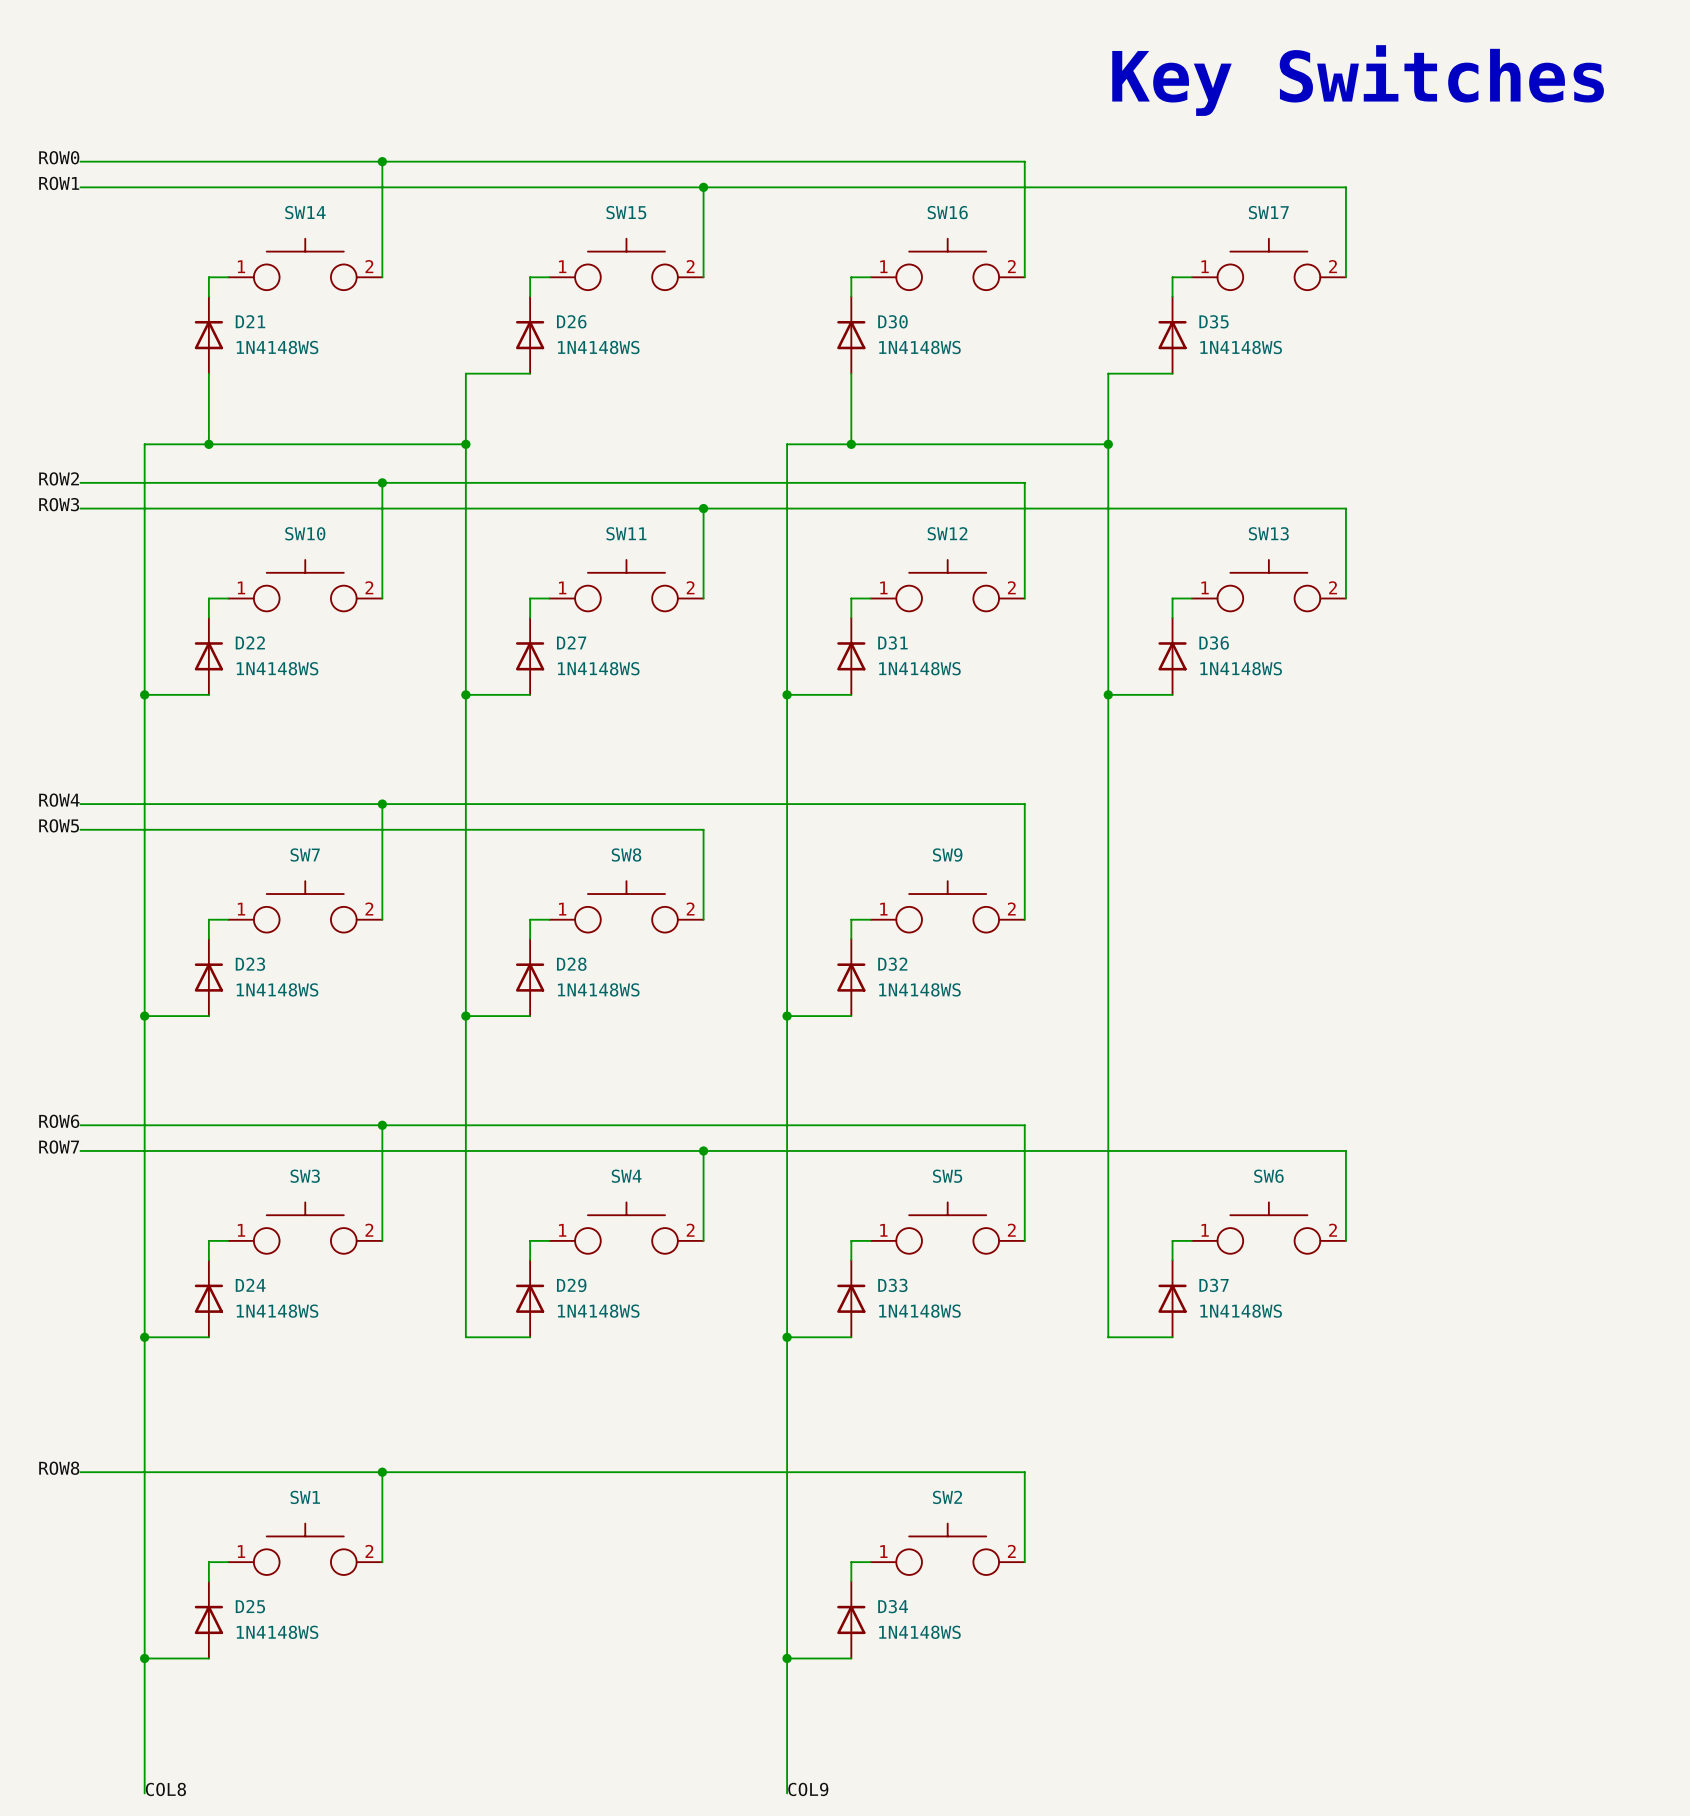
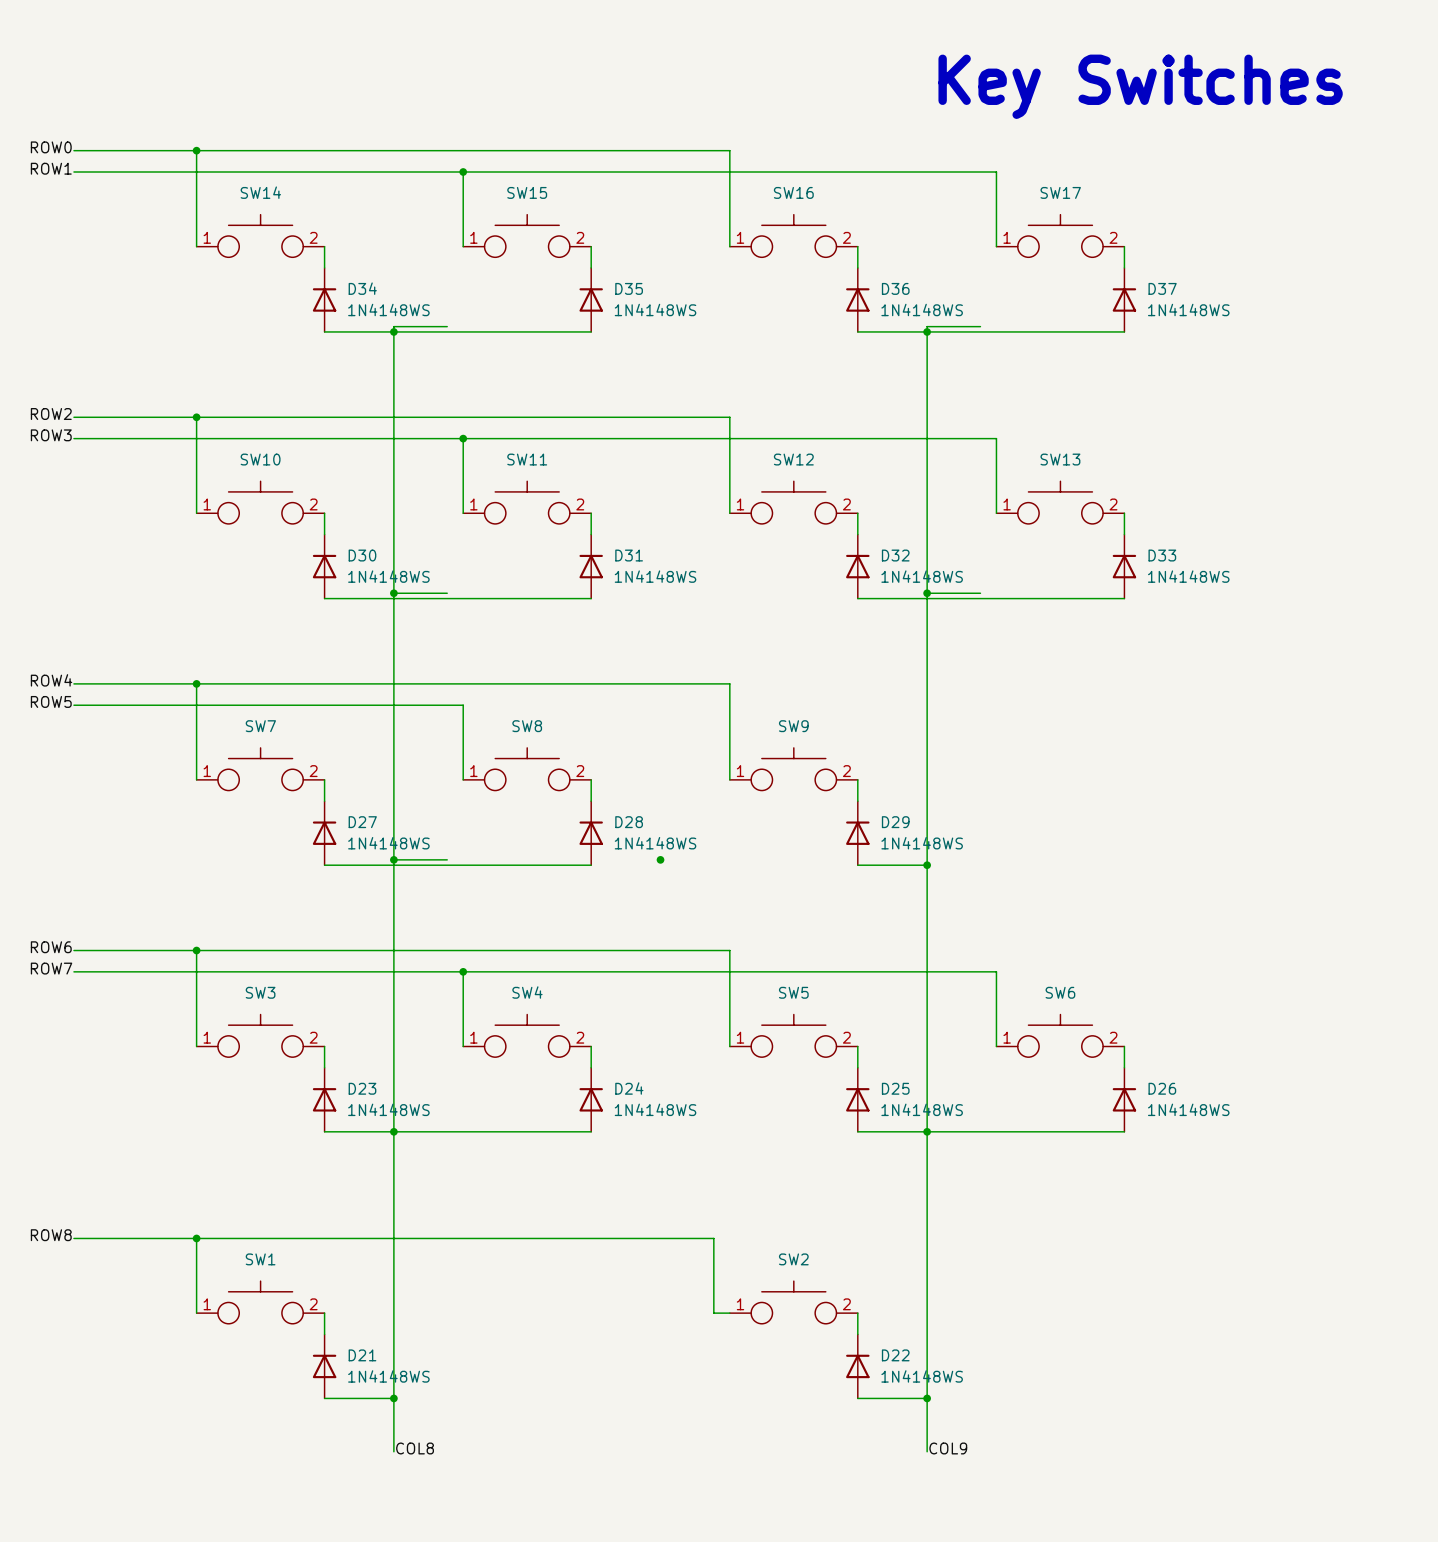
junction: none -> (196, 150)
wire: (382, 161) (382, 277) -> (324, 267) (324, 246)
junction: (382, 161) -> none
wire: (870, 161) (1024, 161) (1024, 277) -> (857, 267) (857, 246)
junction: none -> (463, 172)
wire: (703, 187) (703, 277) -> (591, 267) (591, 246)
junction: (703, 187) -> none
wire: (1191, 187) (1345, 187) (1345, 277) -> (1124, 267) (1124, 246)
wire: (228, 277) (208, 277) (208, 296) -> (196, 246) (196, 150)
wire: (549, 277) (530, 277) (530, 296) -> (463, 246) (463, 172)
wire: (870, 277) (851, 277) (851, 296) -> (729, 246) (729, 150)
wire: (1191, 277) (1172, 277) (1172, 296) -> (996, 246) (996, 172)
D21 position: (208, 335) -> (324, 1366)
D26 position: (530, 335) -> (1124, 1099)
D30 position: (851, 335) -> (324, 566)
D35 position: (1172, 335) -> (591, 299)
wire: (208, 373) (208, 444) -> none
wire: (851, 373) (851, 444) -> none
wire: none -> (324, 331) (591, 331)
junction: none -> (393, 331)
wire: none -> (857, 331) (1124, 331)
junction: none -> (927, 331)
junction position: (208, 444) -> (196, 417)
wire: (465, 444) (144, 444) (144, 1793) -> none
junction: (465, 444) -> none
junction: (851, 444) -> none
wire: (1108, 444) (787, 444) (787, 1793) -> none
junction: (1108, 444) -> none
wire: (382, 482) (382, 598) -> (324, 534) (324, 513)
junction: (382, 482) -> none
wire: (870, 482) (1024, 482) (1024, 598) -> (857, 534) (857, 513)
junction: none -> (463, 438)
wire: (703, 508) (703, 598) -> (591, 534) (591, 513)
junction: (703, 508) -> none
wire: (1191, 508) (1345, 508) (1345, 598) -> (1124, 534) (1124, 513)
wire: (228, 598) (208, 598) (208, 617) -> (196, 513) (196, 417)
wire: (549, 598) (530, 598) (530, 617) -> (463, 513) (463, 438)
wire: (870, 598) (851, 598) (851, 617) -> (729, 513) (729, 417)
wire: (1191, 598) (1172, 598) (1172, 617) -> (996, 513) (996, 438)
D22 position: (208, 656) -> (857, 1366)
D27 position: (530, 656) -> (324, 833)
D31 position: (851, 656) -> (591, 566)
D36 position: (1172, 656) -> (857, 299)
wire: (144, 694) (208, 694) -> none
junction: (144, 694) -> none
wire: (787, 694) (851, 694) -> none
junction: (787, 694) -> none
wire: none -> (324, 598) (591, 598)
wire: none -> (857, 598) (1124, 598)
junction: none -> (196, 683)
wire: (382, 804) (382, 919) -> (324, 801) (324, 779)
junction: (382, 804) -> none
wire: (870, 804) (1024, 804) (1024, 919) -> (857, 801) (857, 779)
wire: (549, 829) (703, 829) (703, 919) -> (591, 801) (591, 779)
wire: (228, 919) (208, 919) (208, 938) -> (196, 779) (196, 683)
wire: (549, 919) (530, 919) (530, 938) -> (463, 779) (463, 705)
wire: (870, 919) (851, 919) (851, 938) -> (729, 779) (729, 683)
D23 position: (208, 977) -> (324, 1099)
D28 position: (530, 977) -> (591, 833)
D32 position: (851, 977) -> (857, 566)
wire: (144, 1016) (208, 1016) -> none
junction: (144, 1016) -> none
wire: (787, 1016) (851, 1016) -> none
wire: none -> (324, 865) (591, 865)
wire: none -> (857, 865) (927, 865)
junction: none -> (927, 865)
junction: none -> (196, 950)
wire: (382, 1125) (382, 1240) -> (324, 1067) (324, 1046)
junction: (382, 1125) -> none
wire: (870, 1125) (1024, 1125) (1024, 1240) -> (857, 1067) (857, 1046)
junction: none -> (463, 971)
wire: (703, 1150) (703, 1240) -> (591, 1067) (591, 1046)
junction: (703, 1150) -> none
wire: (1191, 1150) (1345, 1150) (1345, 1240) -> (1124, 1067) (1124, 1046)
wire: (228, 1240) (208, 1240) (208, 1260) -> (196, 1046) (196, 950)
wire: (549, 1240) (530, 1240) (530, 1260) -> (463, 1046) (463, 971)
wire: (870, 1240) (851, 1240) (851, 1260) -> (729, 1046) (729, 950)
wire: (1191, 1240) (1172, 1240) (1172, 1260) -> (996, 1046) (996, 971)
D24 position: (208, 1298) -> (591, 1099)
D29 position: (530, 1298) -> (857, 833)
D33 position: (851, 1298) -> (1124, 566)
D37 position: (1172, 1298) -> (1124, 299)
wire: (144, 1337) (208, 1337) -> none
junction: (144, 1337) -> none
wire: (465, 1337) (530, 1337) -> (393, 1126) (393, 1451)
wire: (787, 1337) (851, 1337) -> none
junction: (787, 1337) -> none
wire: (1108, 1337) (1172, 1337) -> (927, 1126) (927, 1451)
wire: none -> (324, 1131) (591, 1131)
junction: none -> (393, 1131)
wire: none -> (857, 1131) (1124, 1131)
junction: none -> (927, 1131)
junction: none -> (196, 1238)
wire: (382, 1472) (382, 1562) -> (324, 1334) (324, 1313)
junction: (382, 1472) -> none
wire: (851, 1472) (1024, 1472) (1024, 1562) -> (857, 1334) (857, 1313)
wire: (228, 1562) (208, 1562) (208, 1581) -> (196, 1313) (196, 1238)
wire: (851, 1562) (851, 1581) -> (713, 1313) (713, 1238)
D25 position: (208, 1619) -> (857, 1099)
D34 position: (851, 1619) -> (324, 299)
wire: (144, 1658) (208, 1658) -> none
junction: (144, 1658) -> none
wire: (787, 1658) (851, 1658) -> none
junction: (787, 1658) -> none
wire: none -> (324, 1398) (393, 1398)
junction: none -> (393, 1398)
wire: none -> (857, 1398) (927, 1398)
junction: none -> (927, 1398)
label: none -> COL8 (415, 1448)
label: none -> COL9 (948, 1448)
label: COL8 (165, 1789) -> none
label: COL9 (808, 1789) -> none

